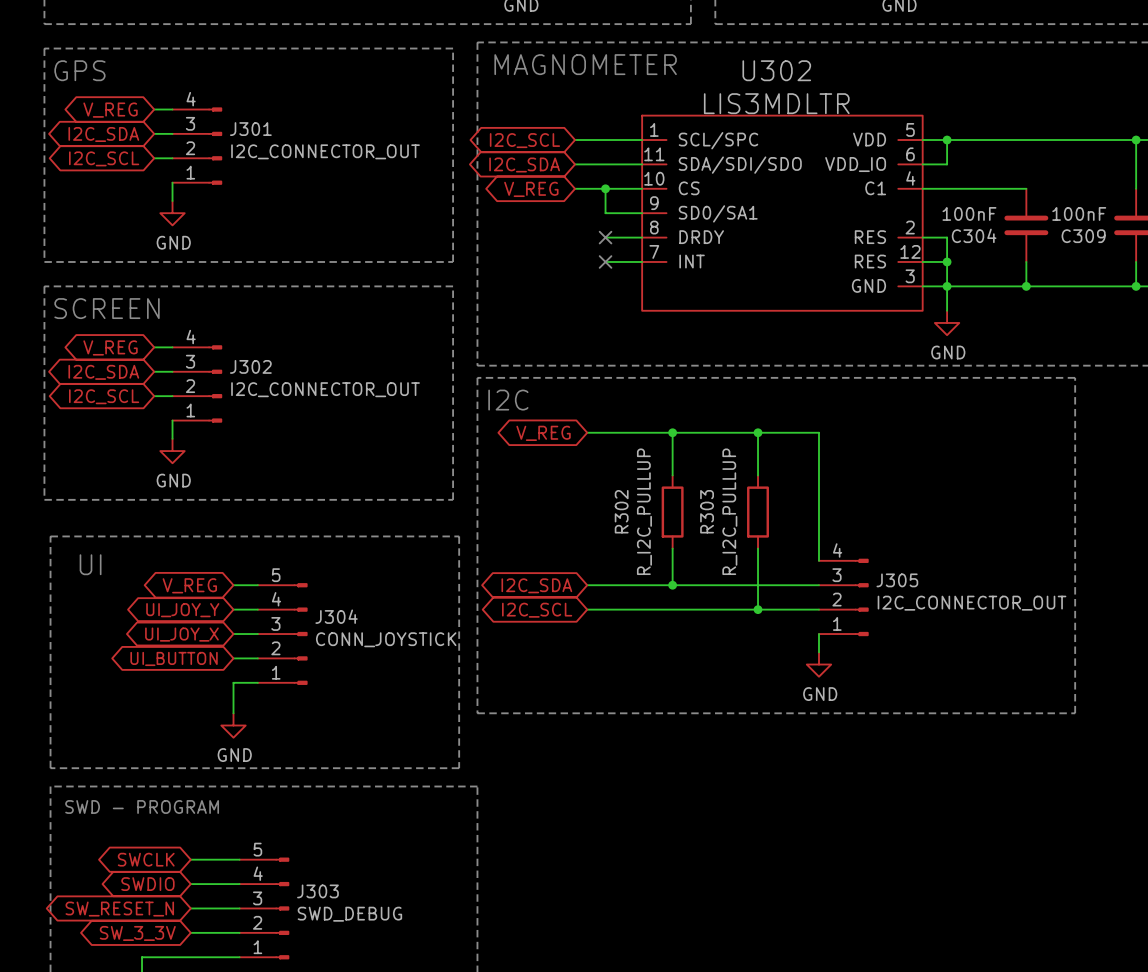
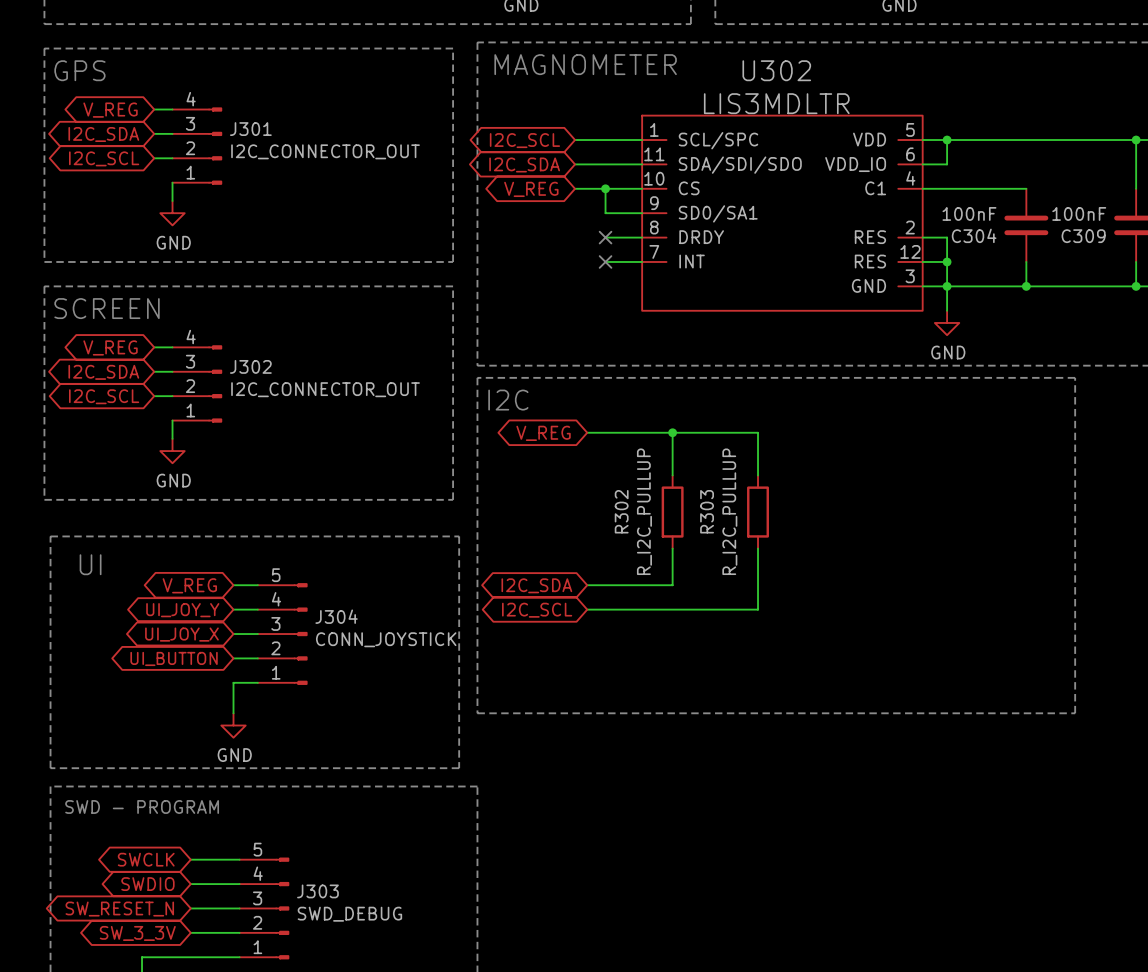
wire: (758, 432) (819, 432) (819, 560) -> none
junction: (758, 432) -> none
wire: (672, 585) (819, 585) -> none
junction: (672, 585) -> none
J305: I2C_CONNECTOR_OUT (843, 597) -> none
wire: (758, 609) (819, 609) -> none
junction: (758, 609) -> none
wire: (819, 634) (819, 652) -> none
power symbol: GND (819, 664) -> none

